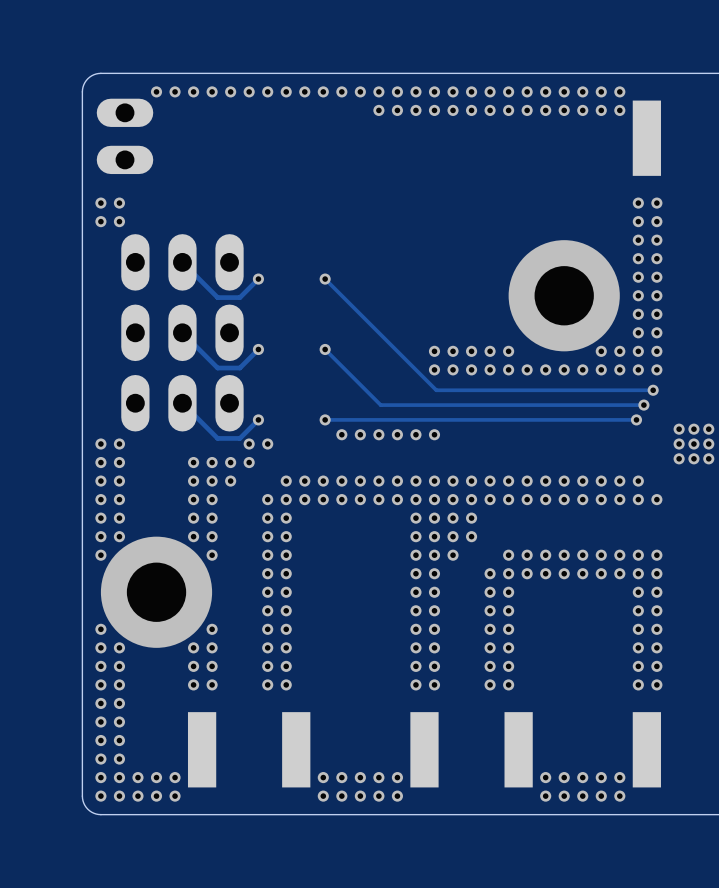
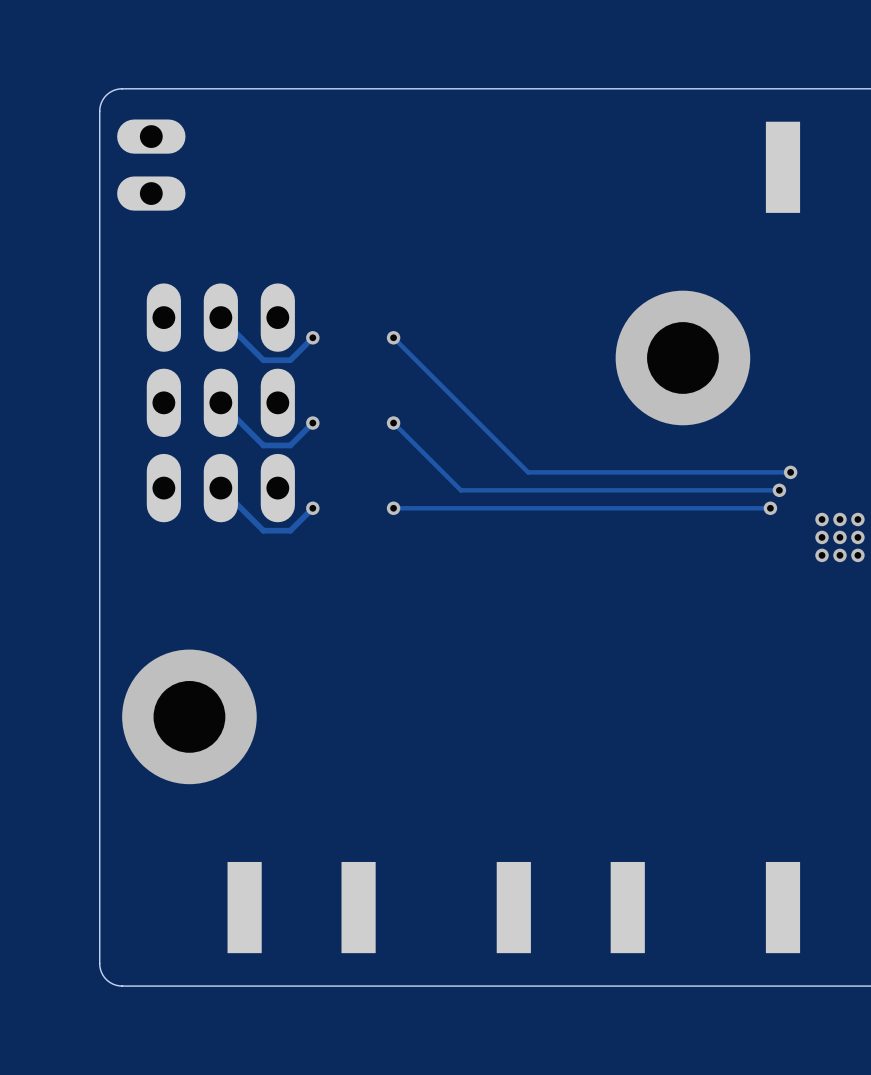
via: (156, 91) -> none
via: (175, 91) -> none
via: (193, 91) -> none
via: (212, 91) -> none
via: (230, 91) -> none
via: (249, 91) -> none
via: (267, 91) -> none
via: (286, 91) -> none
via: (304, 91) -> none
via: (323, 91) -> none
via: (341, 91) -> none
via: (360, 91) -> none
via: (378, 91) -> none
via: (397, 91) -> none
via: (415, 91) -> none
via: (434, 91) -> none
via: (453, 91) -> none
via: (471, 91) -> none
via: (490, 91) -> none
via: (508, 91) -> none
via: (527, 91) -> none
via: (545, 91) -> none
via: (564, 91) -> none
via: (582, 91) -> none
via: (601, 91) -> none
via: (619, 91) -> none
via: (378, 110) -> none
via: (397, 110) -> none
via: (415, 110) -> none
via: (434, 110) -> none
via: (453, 110) -> none
via: (471, 110) -> none
via: (490, 110) -> none
via: (508, 110) -> none
via: (527, 110) -> none
via: (545, 110) -> none
via: (564, 110) -> none
via: (582, 110) -> none
via: (601, 110) -> none
via: (619, 110) -> none
via: (100, 203) -> none
via: (119, 203) -> none
via: (638, 203) -> none
via: (656, 203) -> none
via: (100, 221) -> none
via: (119, 221) -> none
via: (638, 221) -> none
via: (656, 221) -> none
via: (638, 240) -> none
via: (656, 240) -> none
via: (638, 258) -> none
via: (656, 258) -> none
via: (638, 277) -> none
via: (656, 277) -> none
via: (638, 295) -> none
via: (656, 295) -> none
via: (638, 314) -> none
via: (656, 314) -> none
via: (638, 332) -> none
via: (656, 332) -> none
via: (434, 351) -> none
via: (453, 351) -> none
via: (471, 351) -> none
via: (490, 351) -> none
via: (508, 351) -> none
via: (601, 351) -> none
via: (619, 351) -> none
via: (638, 351) -> none
via: (656, 351) -> none
via: (434, 369) -> none
via: (453, 369) -> none
via: (471, 369) -> none
via: (490, 369) -> none
via: (508, 369) -> none
via: (527, 369) -> none
via: (545, 369) -> none
via: (564, 369) -> none
via: (582, 369) -> none
via: (601, 369) -> none
via: (619, 369) -> none
via: (638, 369) -> none
via: (656, 369) -> none
via: (341, 434) -> none
via: (360, 434) -> none
via: (378, 434) -> none
via: (397, 434) -> none
via: (415, 434) -> none
via: (434, 434) -> none
via: (100, 444) -> none
via: (119, 444) -> none
via: (249, 444) -> none
via: (267, 444) -> none
via: (100, 462) -> none
via: (119, 462) -> none
via: (193, 462) -> none
via: (212, 462) -> none
via: (230, 462) -> none
via: (249, 462) -> none
via: (100, 481) -> none
via: (119, 481) -> none
via: (193, 481) -> none
via: (212, 481) -> none
via: (230, 481) -> none
via: (286, 481) -> none
via: (304, 481) -> none
via: (323, 481) -> none
via: (341, 481) -> none
via: (360, 481) -> none
via: (378, 481) -> none
via: (397, 481) -> none
via: (415, 481) -> none
via: (434, 481) -> none
via: (453, 481) -> none
via: (471, 481) -> none
via: (490, 481) -> none
via: (508, 481) -> none
via: (527, 481) -> none
via: (545, 481) -> none
via: (564, 481) -> none
via: (582, 481) -> none
via: (601, 481) -> none
via: (619, 481) -> none
via: (638, 481) -> none
via: (100, 499) -> none
via: (119, 499) -> none
via: (193, 499) -> none
via: (212, 499) -> none
via: (267, 499) -> none
via: (286, 499) -> none
via: (304, 499) -> none
via: (323, 499) -> none
via: (341, 499) -> none
via: (360, 499) -> none
via: (378, 499) -> none
via: (397, 499) -> none
via: (415, 499) -> none
via: (434, 499) -> none
via: (453, 499) -> none
via: (471, 499) -> none
via: (490, 499) -> none
via: (508, 499) -> none
via: (527, 499) -> none
via: (545, 499) -> none
via: (564, 499) -> none
via: (582, 499) -> none
via: (601, 499) -> none
via: (619, 499) -> none
via: (638, 499) -> none
via: (656, 499) -> none
via: (100, 518) -> none
via: (119, 518) -> none
via: (193, 518) -> none
via: (212, 518) -> none
via: (267, 518) -> none
via: (286, 518) -> none
via: (415, 518) -> none
via: (434, 518) -> none
via: (453, 518) -> none
via: (471, 518) -> none
via: (100, 536) -> none
via: (119, 536) -> none
via: (193, 536) -> none
via: (212, 536) -> none
via: (267, 536) -> none
via: (286, 536) -> none
via: (415, 536) -> none
via: (434, 536) -> none
via: (453, 536) -> none
via: (471, 536) -> none
via: (100, 555) -> none
via: (212, 555) -> none
via: (267, 555) -> none
via: (286, 555) -> none
via: (415, 555) -> none
via: (434, 555) -> none
via: (453, 555) -> none
via: (508, 555) -> none
via: (527, 555) -> none
via: (545, 555) -> none
via: (564, 555) -> none
via: (582, 555) -> none
via: (601, 555) -> none
via: (619, 555) -> none
via: (638, 555) -> none
via: (656, 555) -> none
via: (267, 573) -> none
via: (286, 573) -> none
via: (415, 573) -> none
via: (434, 573) -> none
via: (490, 573) -> none
via: (508, 573) -> none
via: (527, 573) -> none
via: (545, 573) -> none
via: (564, 573) -> none
via: (582, 573) -> none
via: (601, 573) -> none
via: (619, 573) -> none
via: (638, 573) -> none
via: (656, 573) -> none
via: (267, 592) -> none
via: (286, 592) -> none
via: (415, 592) -> none
via: (434, 592) -> none
via: (490, 592) -> none
via: (508, 592) -> none
via: (638, 592) -> none
via: (656, 592) -> none
via: (267, 610) -> none
via: (286, 610) -> none
via: (415, 610) -> none
via: (434, 610) -> none
via: (490, 610) -> none
via: (508, 610) -> none
via: (638, 610) -> none
via: (656, 610) -> none
via: (100, 629) -> none
via: (212, 629) -> none
via: (267, 629) -> none
via: (286, 629) -> none
via: (415, 629) -> none
via: (434, 629) -> none
via: (490, 629) -> none
via: (508, 629) -> none
via: (638, 629) -> none
via: (656, 629) -> none
via: (100, 647) -> none
via: (119, 647) -> none
via: (193, 647) -> none
via: (212, 647) -> none
via: (267, 647) -> none
via: (286, 647) -> none
via: (415, 647) -> none
via: (434, 647) -> none
via: (490, 647) -> none
via: (508, 647) -> none
via: (638, 647) -> none
via: (656, 647) -> none
via: (100, 666) -> none
via: (119, 666) -> none
via: (193, 666) -> none
via: (212, 666) -> none
via: (267, 666) -> none
via: (286, 666) -> none
via: (415, 666) -> none
via: (434, 666) -> none
via: (490, 666) -> none
via: (508, 666) -> none
via: (638, 666) -> none
via: (656, 666) -> none
via: (100, 684) -> none
via: (119, 684) -> none
via: (193, 684) -> none
via: (212, 684) -> none
via: (267, 684) -> none
via: (286, 684) -> none
via: (415, 684) -> none
via: (434, 684) -> none
via: (490, 684) -> none
via: (508, 684) -> none
via: (638, 684) -> none
via: (656, 684) -> none
via: (100, 703) -> none
via: (119, 703) -> none
via: (100, 721) -> none
via: (119, 721) -> none
via: (100, 740) -> none
via: (119, 740) -> none
via: (100, 759) -> none
via: (119, 759) -> none
via: (100, 777) -> none
via: (119, 777) -> none
via: (137, 777) -> none
via: (156, 777) -> none
via: (175, 777) -> none
via: (323, 777) -> none
via: (341, 777) -> none
via: (360, 777) -> none
via: (378, 777) -> none
via: (397, 777) -> none
via: (545, 777) -> none
via: (564, 777) -> none
via: (582, 777) -> none
via: (601, 777) -> none
via: (619, 777) -> none
via: (100, 796) -> none
via: (119, 796) -> none
via: (137, 796) -> none
via: (156, 796) -> none
via: (175, 796) -> none
via: (323, 796) -> none
via: (341, 796) -> none
via: (360, 796) -> none
via: (378, 796) -> none
via: (397, 796) -> none
via: (545, 796) -> none
via: (564, 796) -> none
via: (582, 796) -> none
via: (601, 796) -> none
via: (619, 796) -> none

